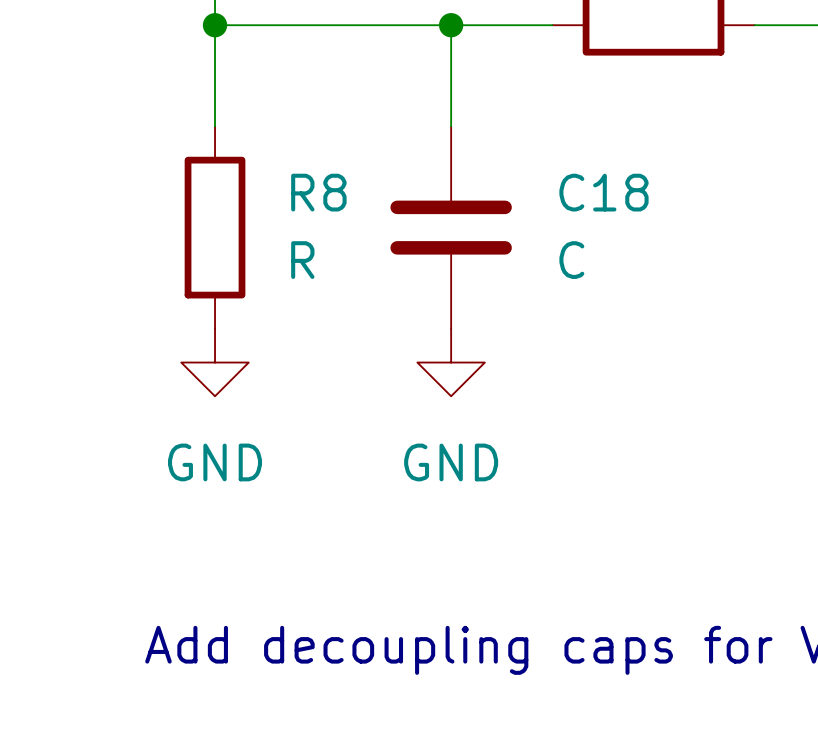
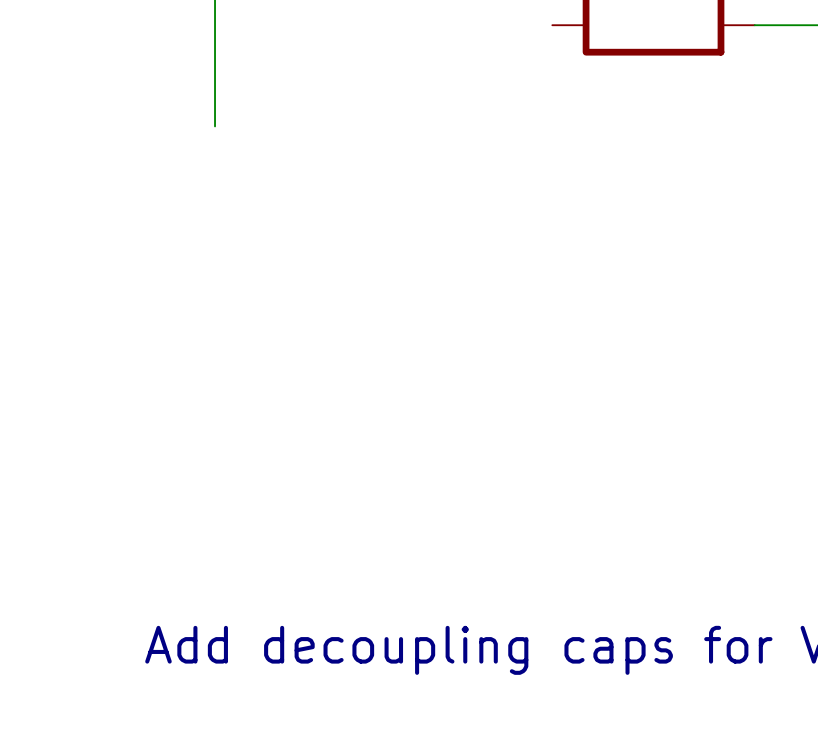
wire: (215, 25) (552, 25) -> none
junction: (215, 25) -> none
wire: (451, 25) (451, 126) -> none
junction: (451, 25) -> none
R8: R (215, 227) -> none
C18: C (451, 227) -> none
power symbol: GND (215, 362) -> none
power symbol: GND (451, 362) -> none

